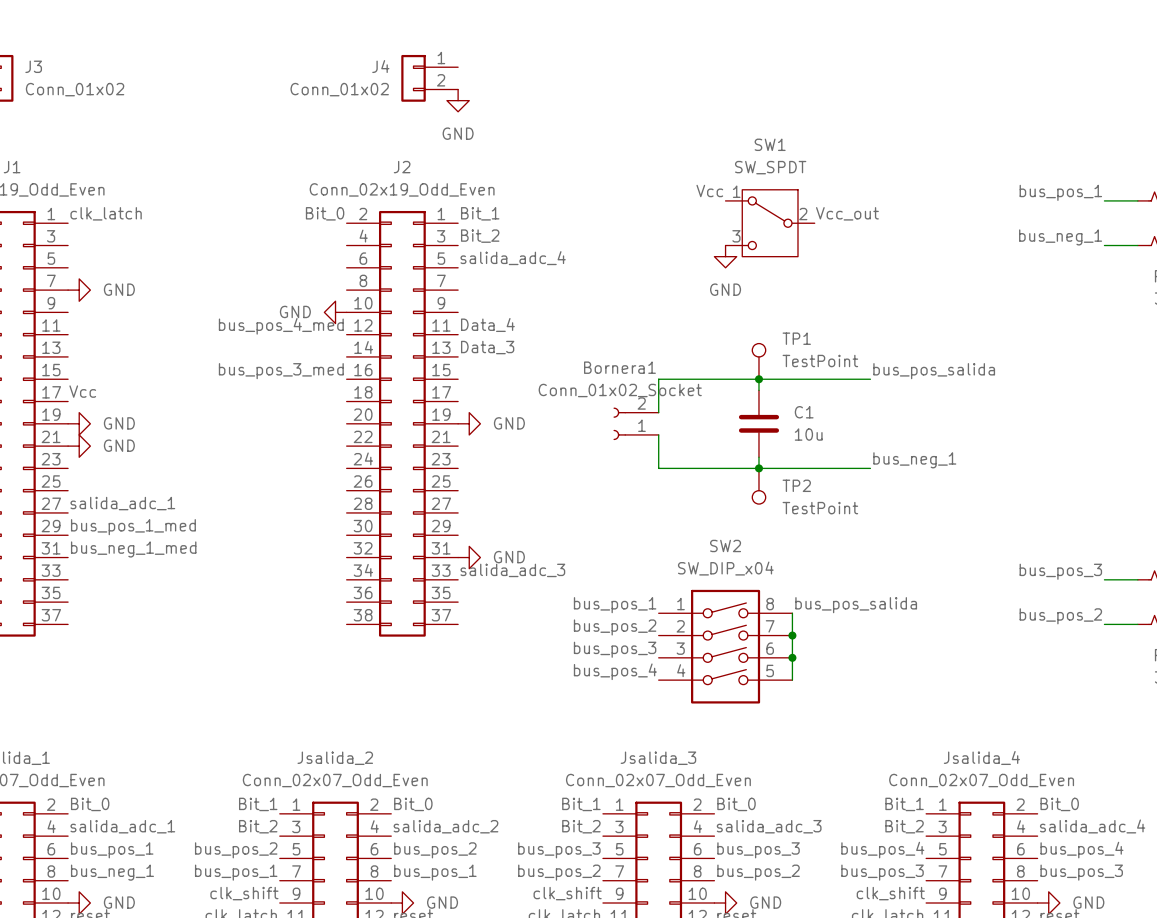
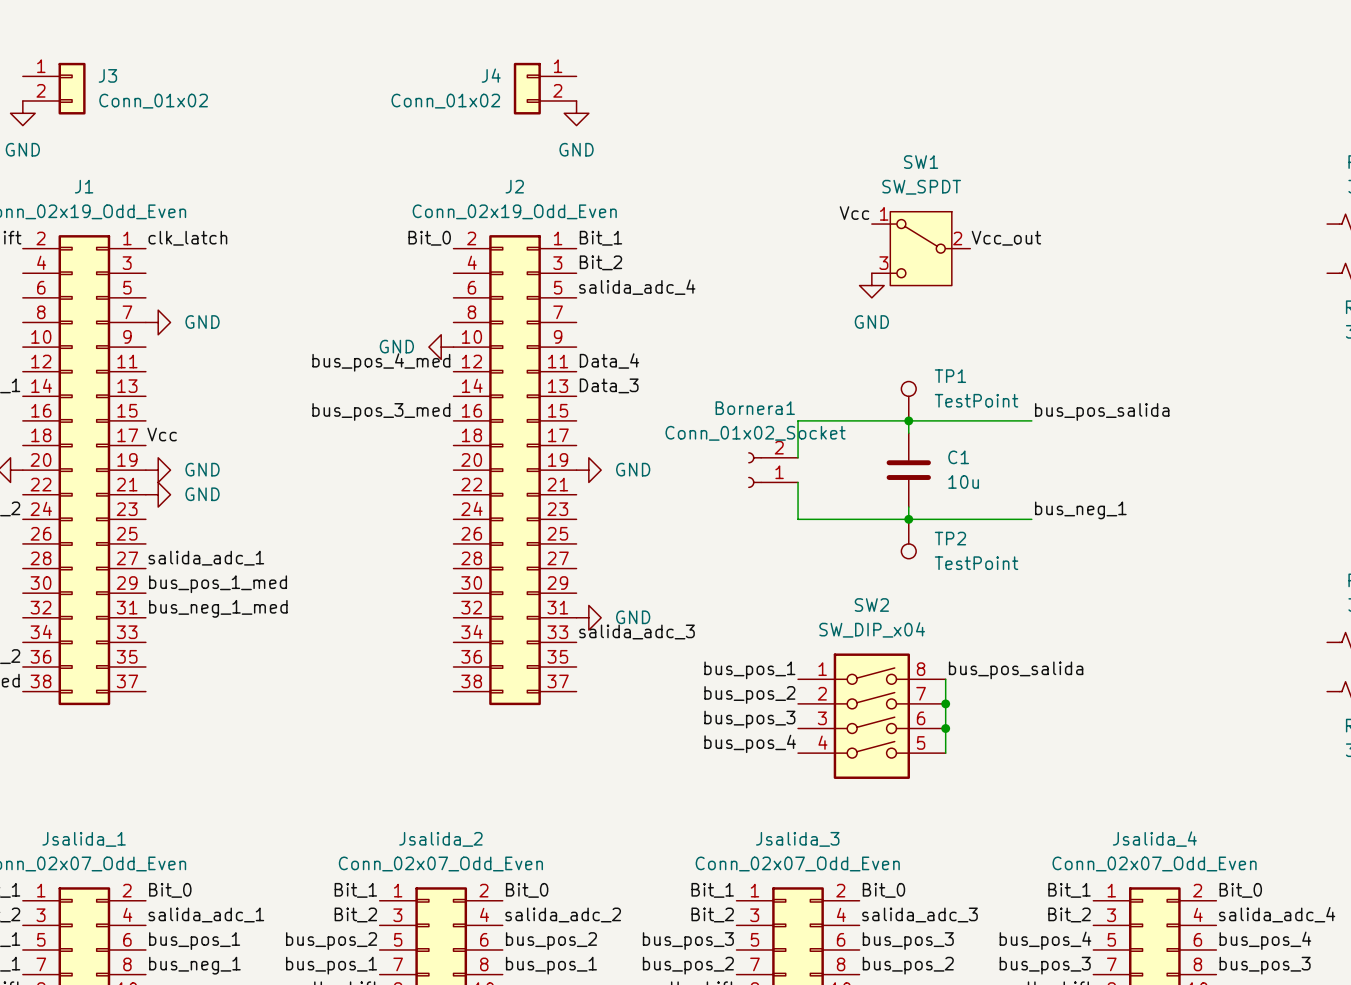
label: bus_pos_1 (1060, 192) -> none
wire: (1104, 200) (1137, 200) -> none
label: bus_neg_1 (1060, 237) -> none
wire: (1104, 245) (1137, 245) -> none
label: bus_pos_3 (1060, 571) -> none
wire: (1104, 579) (1137, 579) -> none
label: bus_pos_2 (1060, 616) -> none
wire: (1104, 624) (1137, 624) -> none

